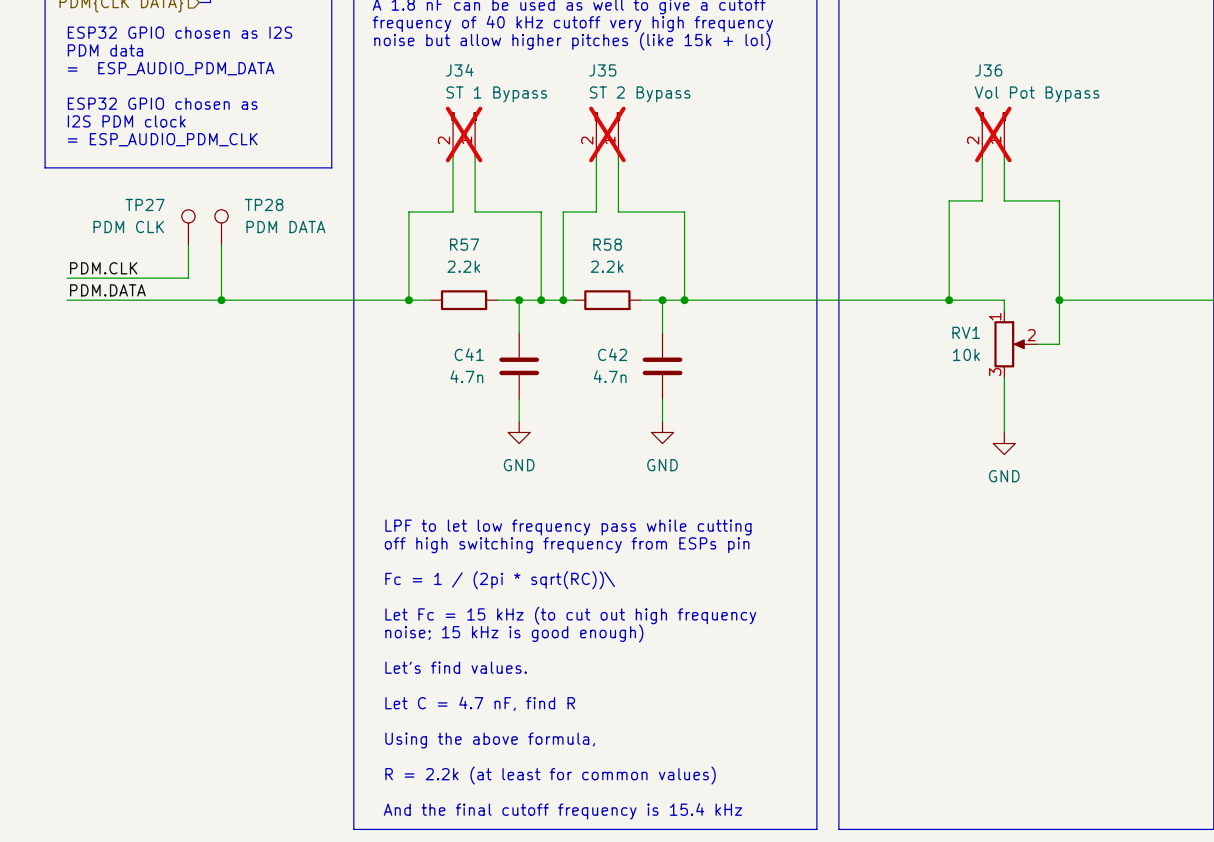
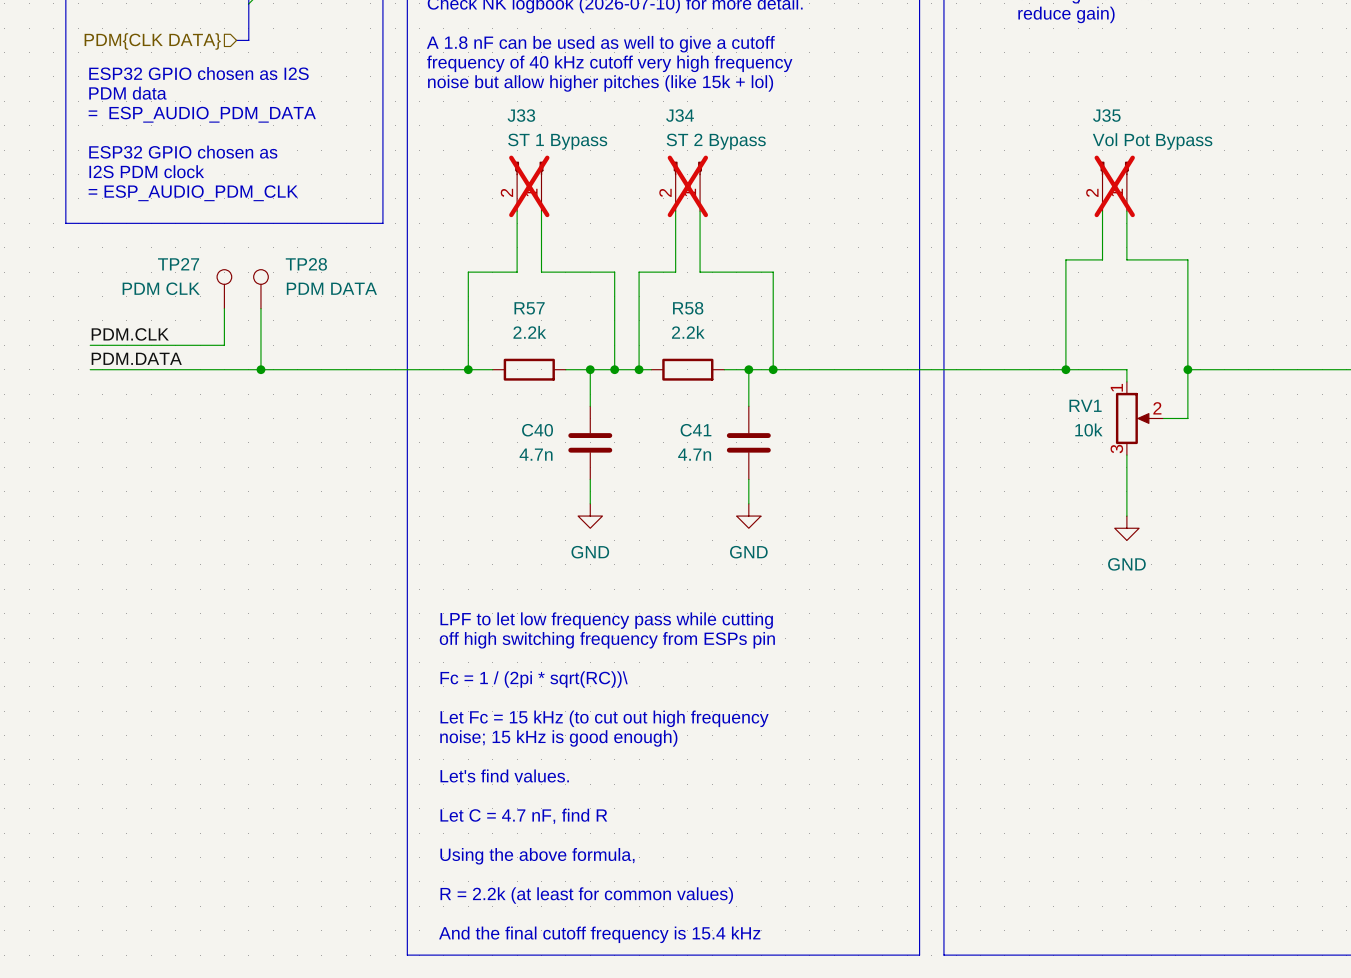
J34 name: J34 (459, 70) -> J33 (521, 115)
J35 name: J35 (602, 70) -> J34 (680, 115)
J36 name: J36 (988, 70) -> J35 (1106, 115)
C41 name: C41 (469, 354) -> C40 (537, 430)
C42 name: C42 (612, 354) -> C41 (695, 430)

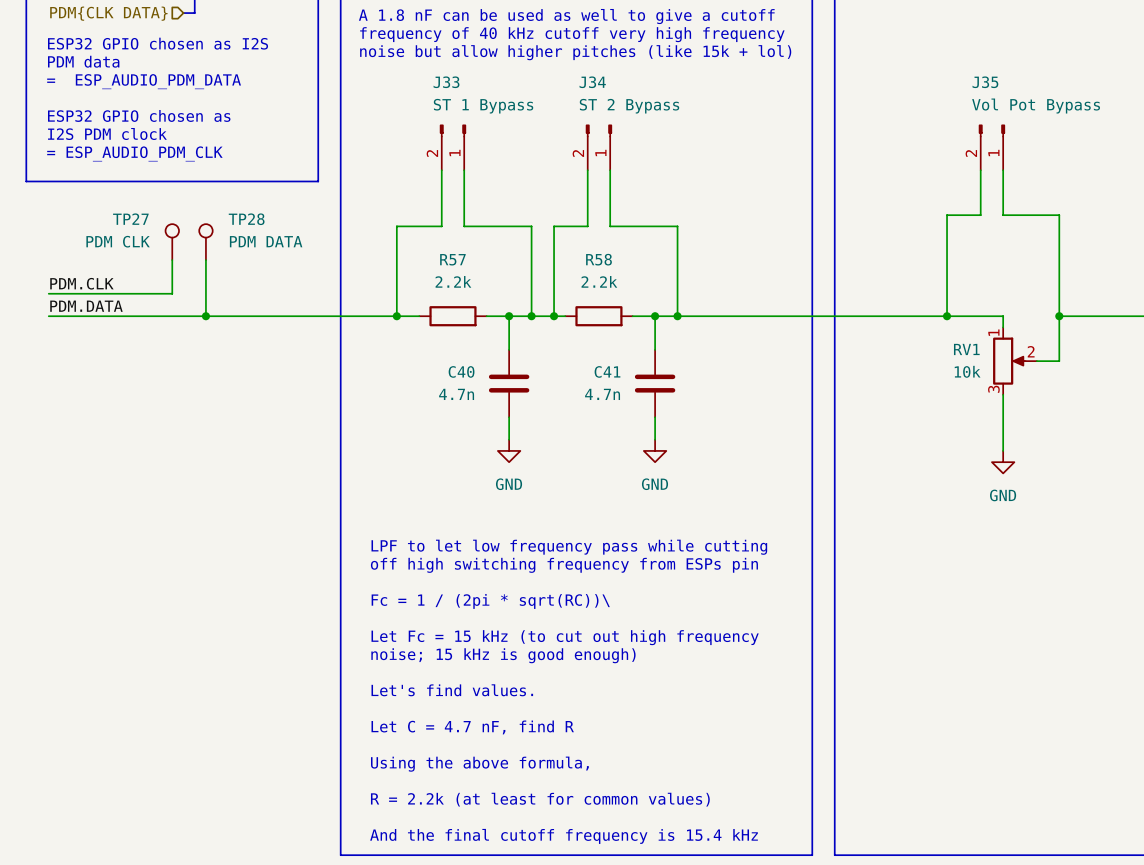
J33 do-not-place cross: (529, 186) -> none
J34 do-not-place cross: (687, 186) -> none
J35 do-not-place cross: (1114, 186) -> none

